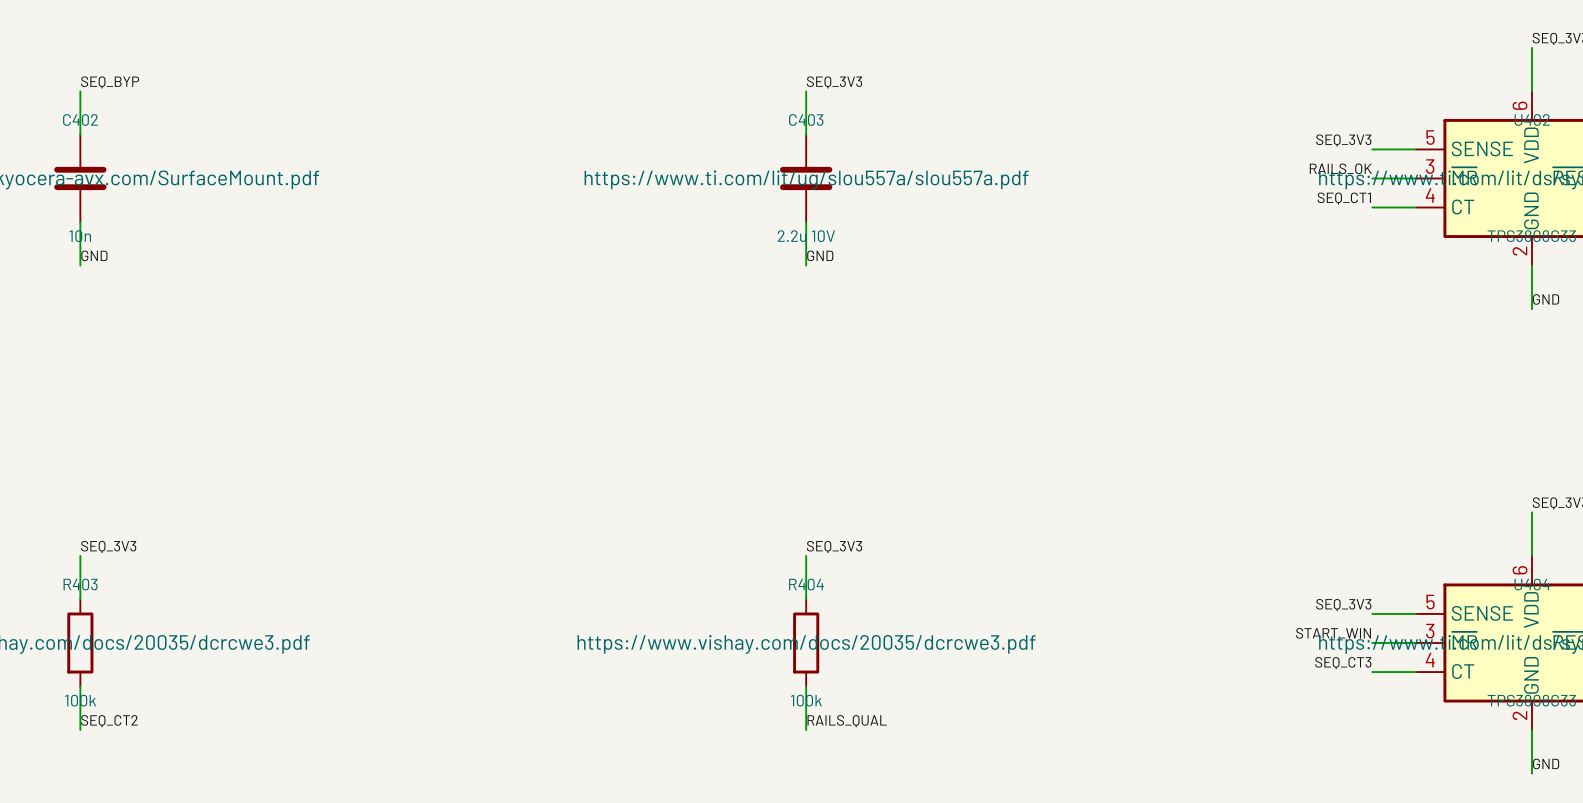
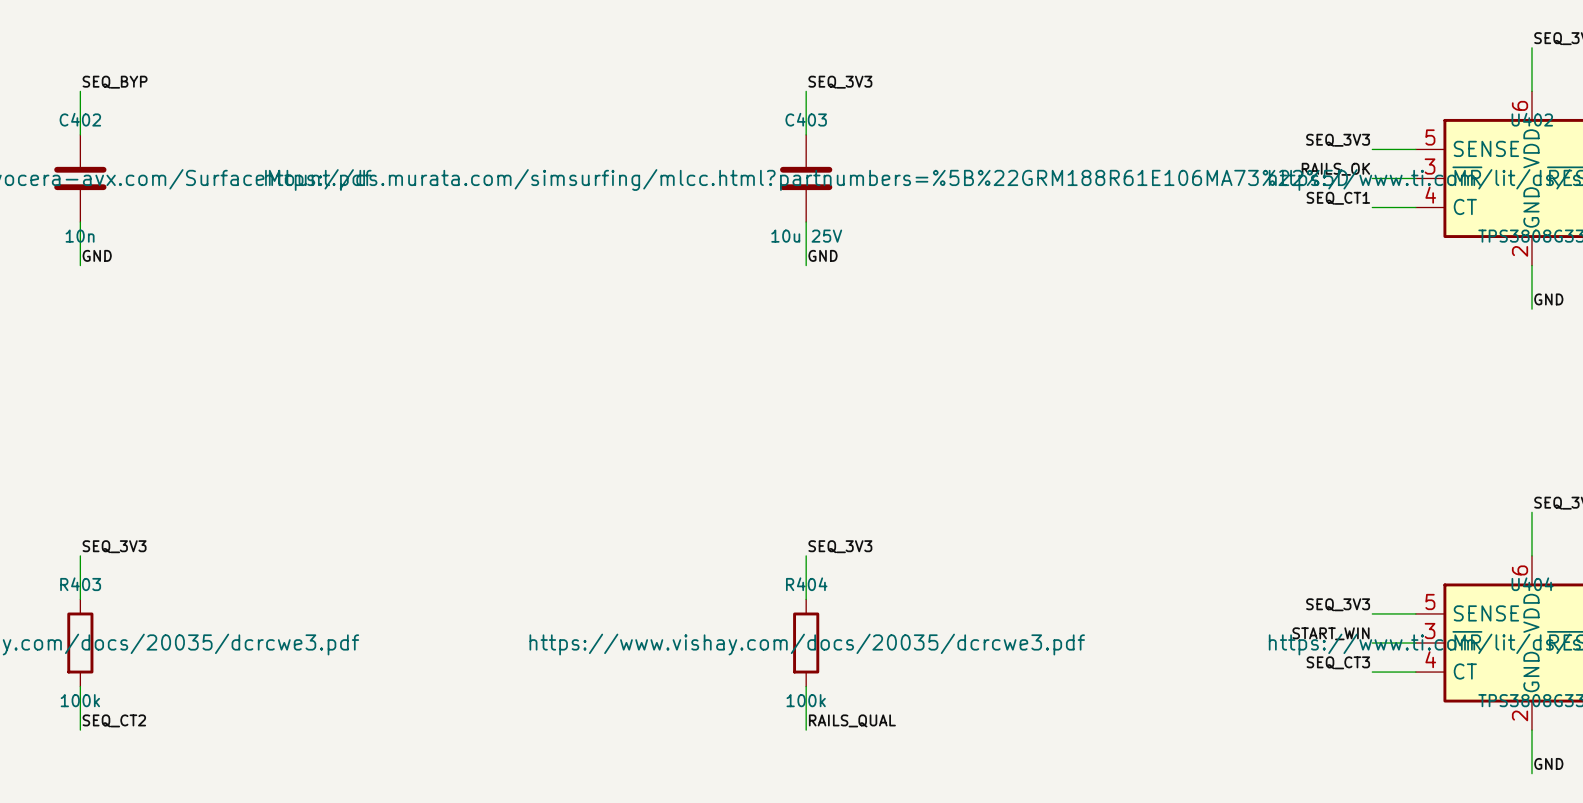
C403 text: https://www.ti.com/lit/ug/slou557a/slou557a.pdf (806, 179) -> https://ds.murata.com/simsurfing/mlcc.html?partnumbers=%5B%22GRM188R61E106MA73%22%5D (806, 180)
C403 value: 2.2u 10V (806, 236) -> 10u 25V (806, 236)

